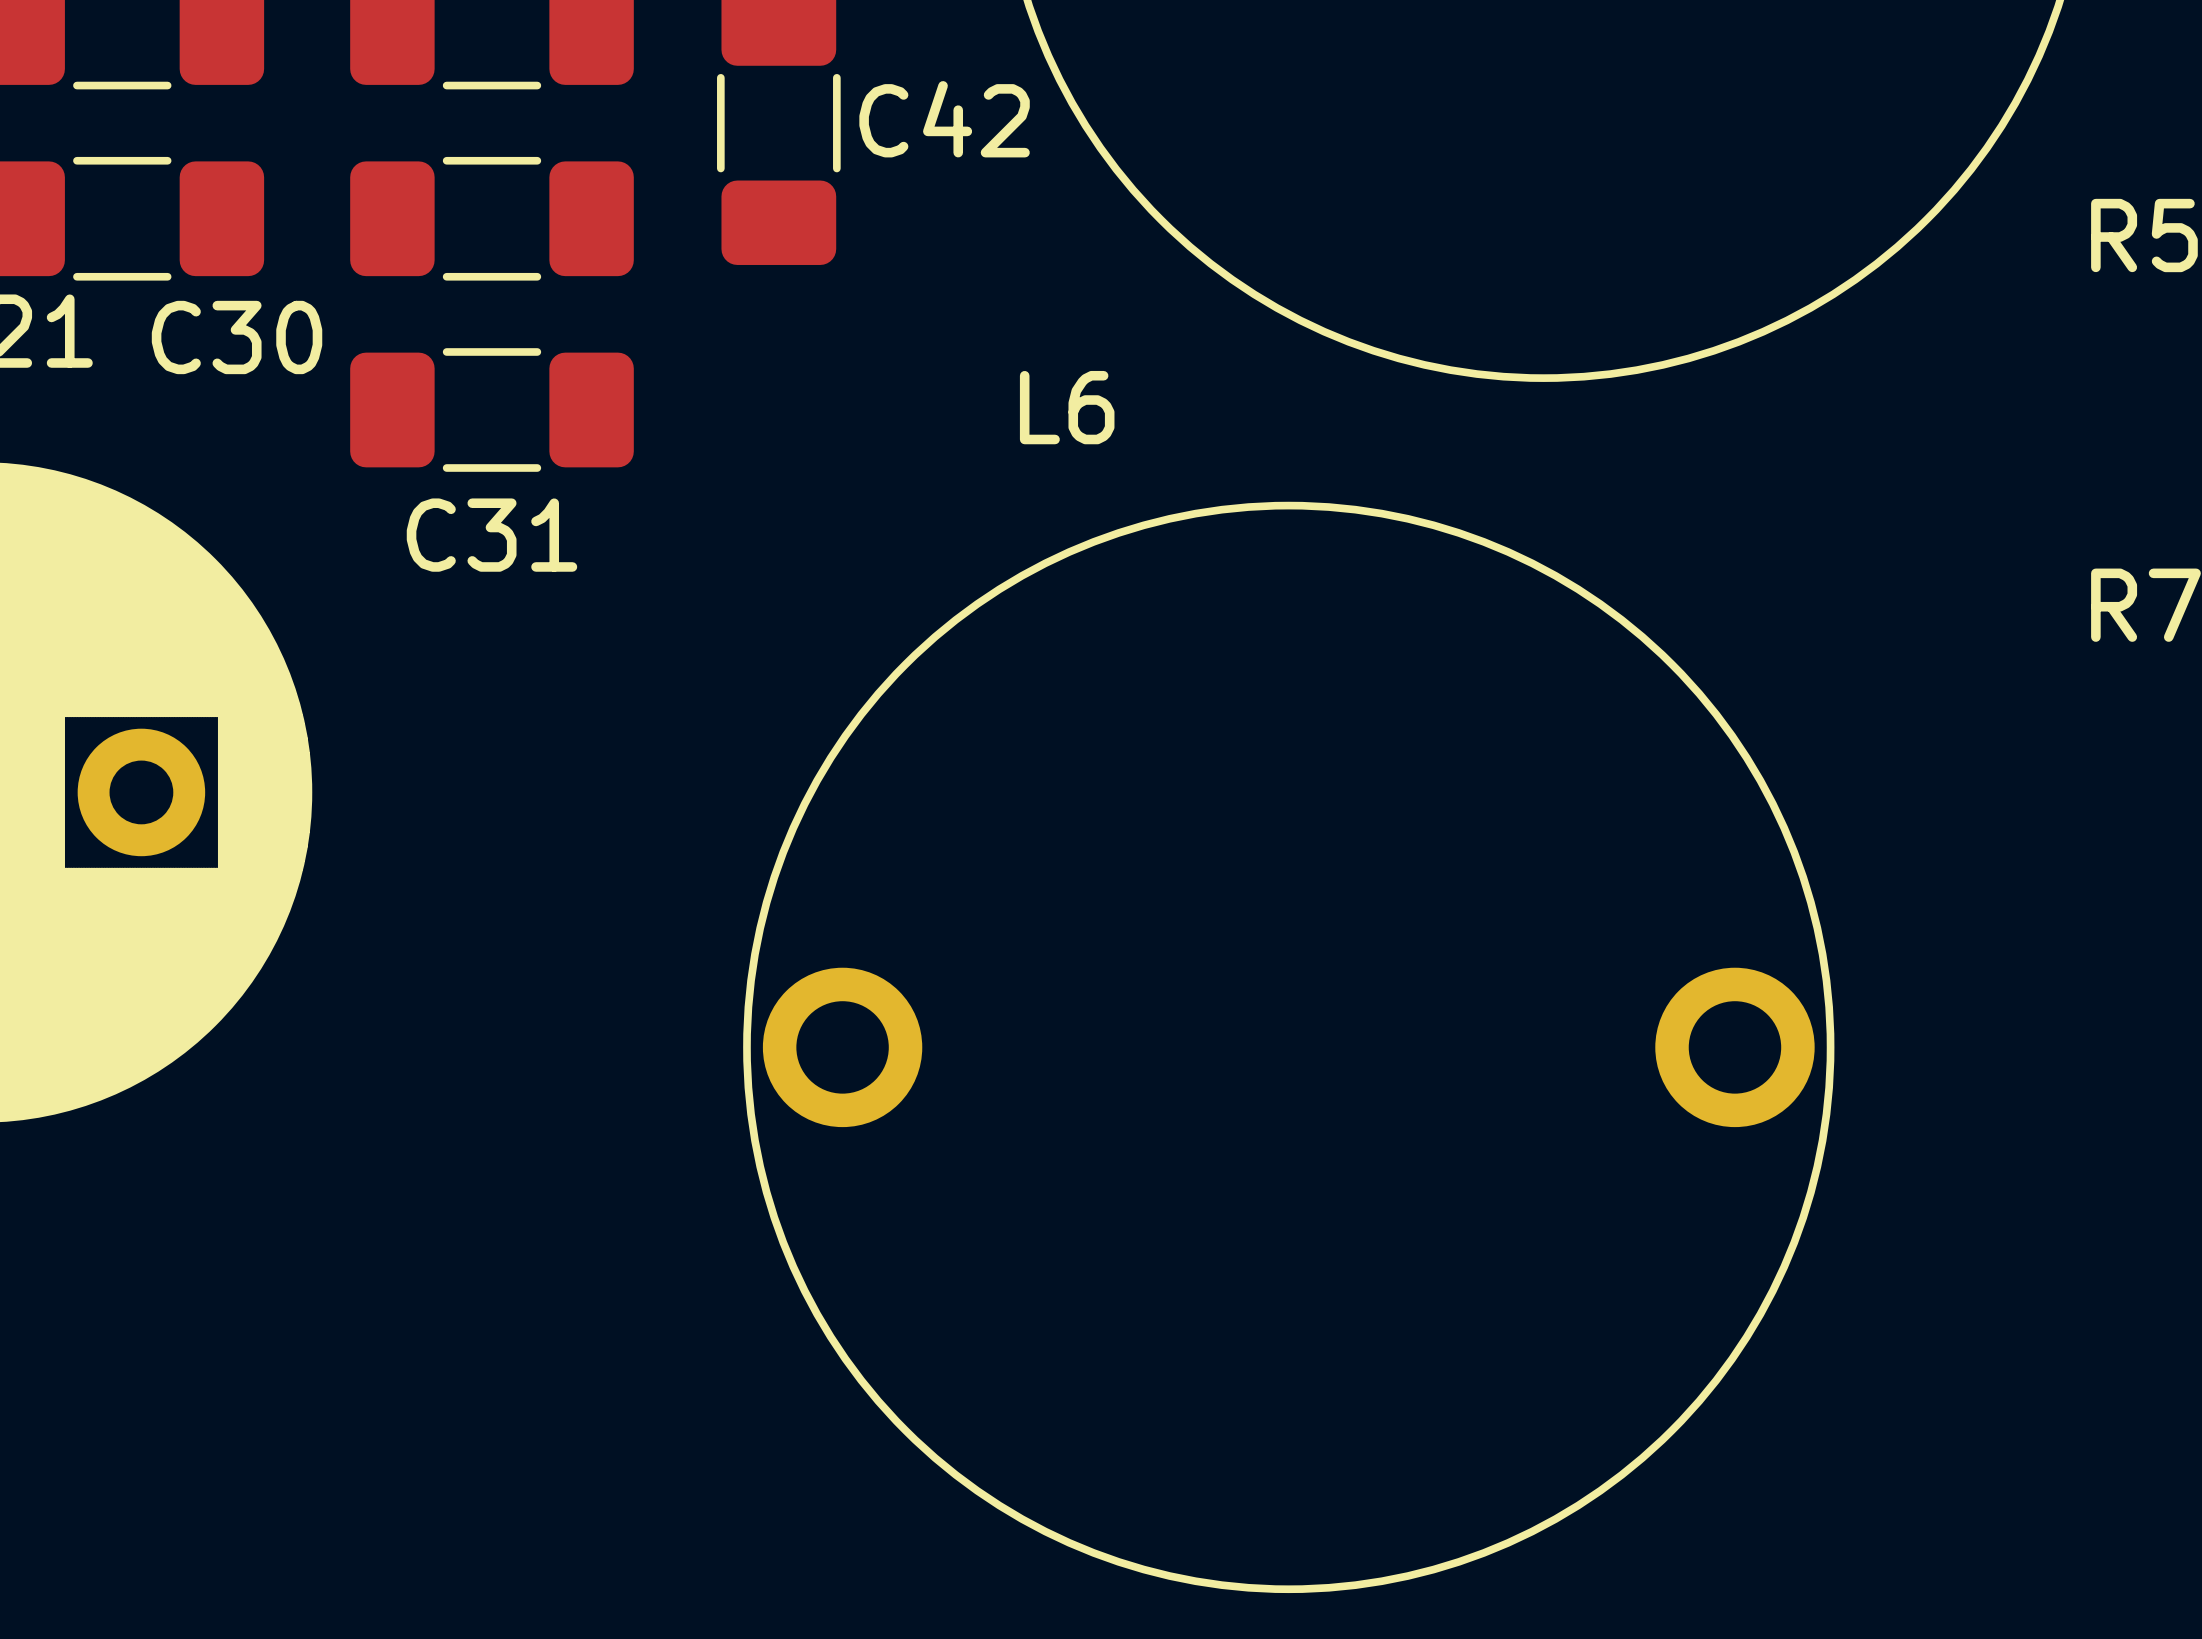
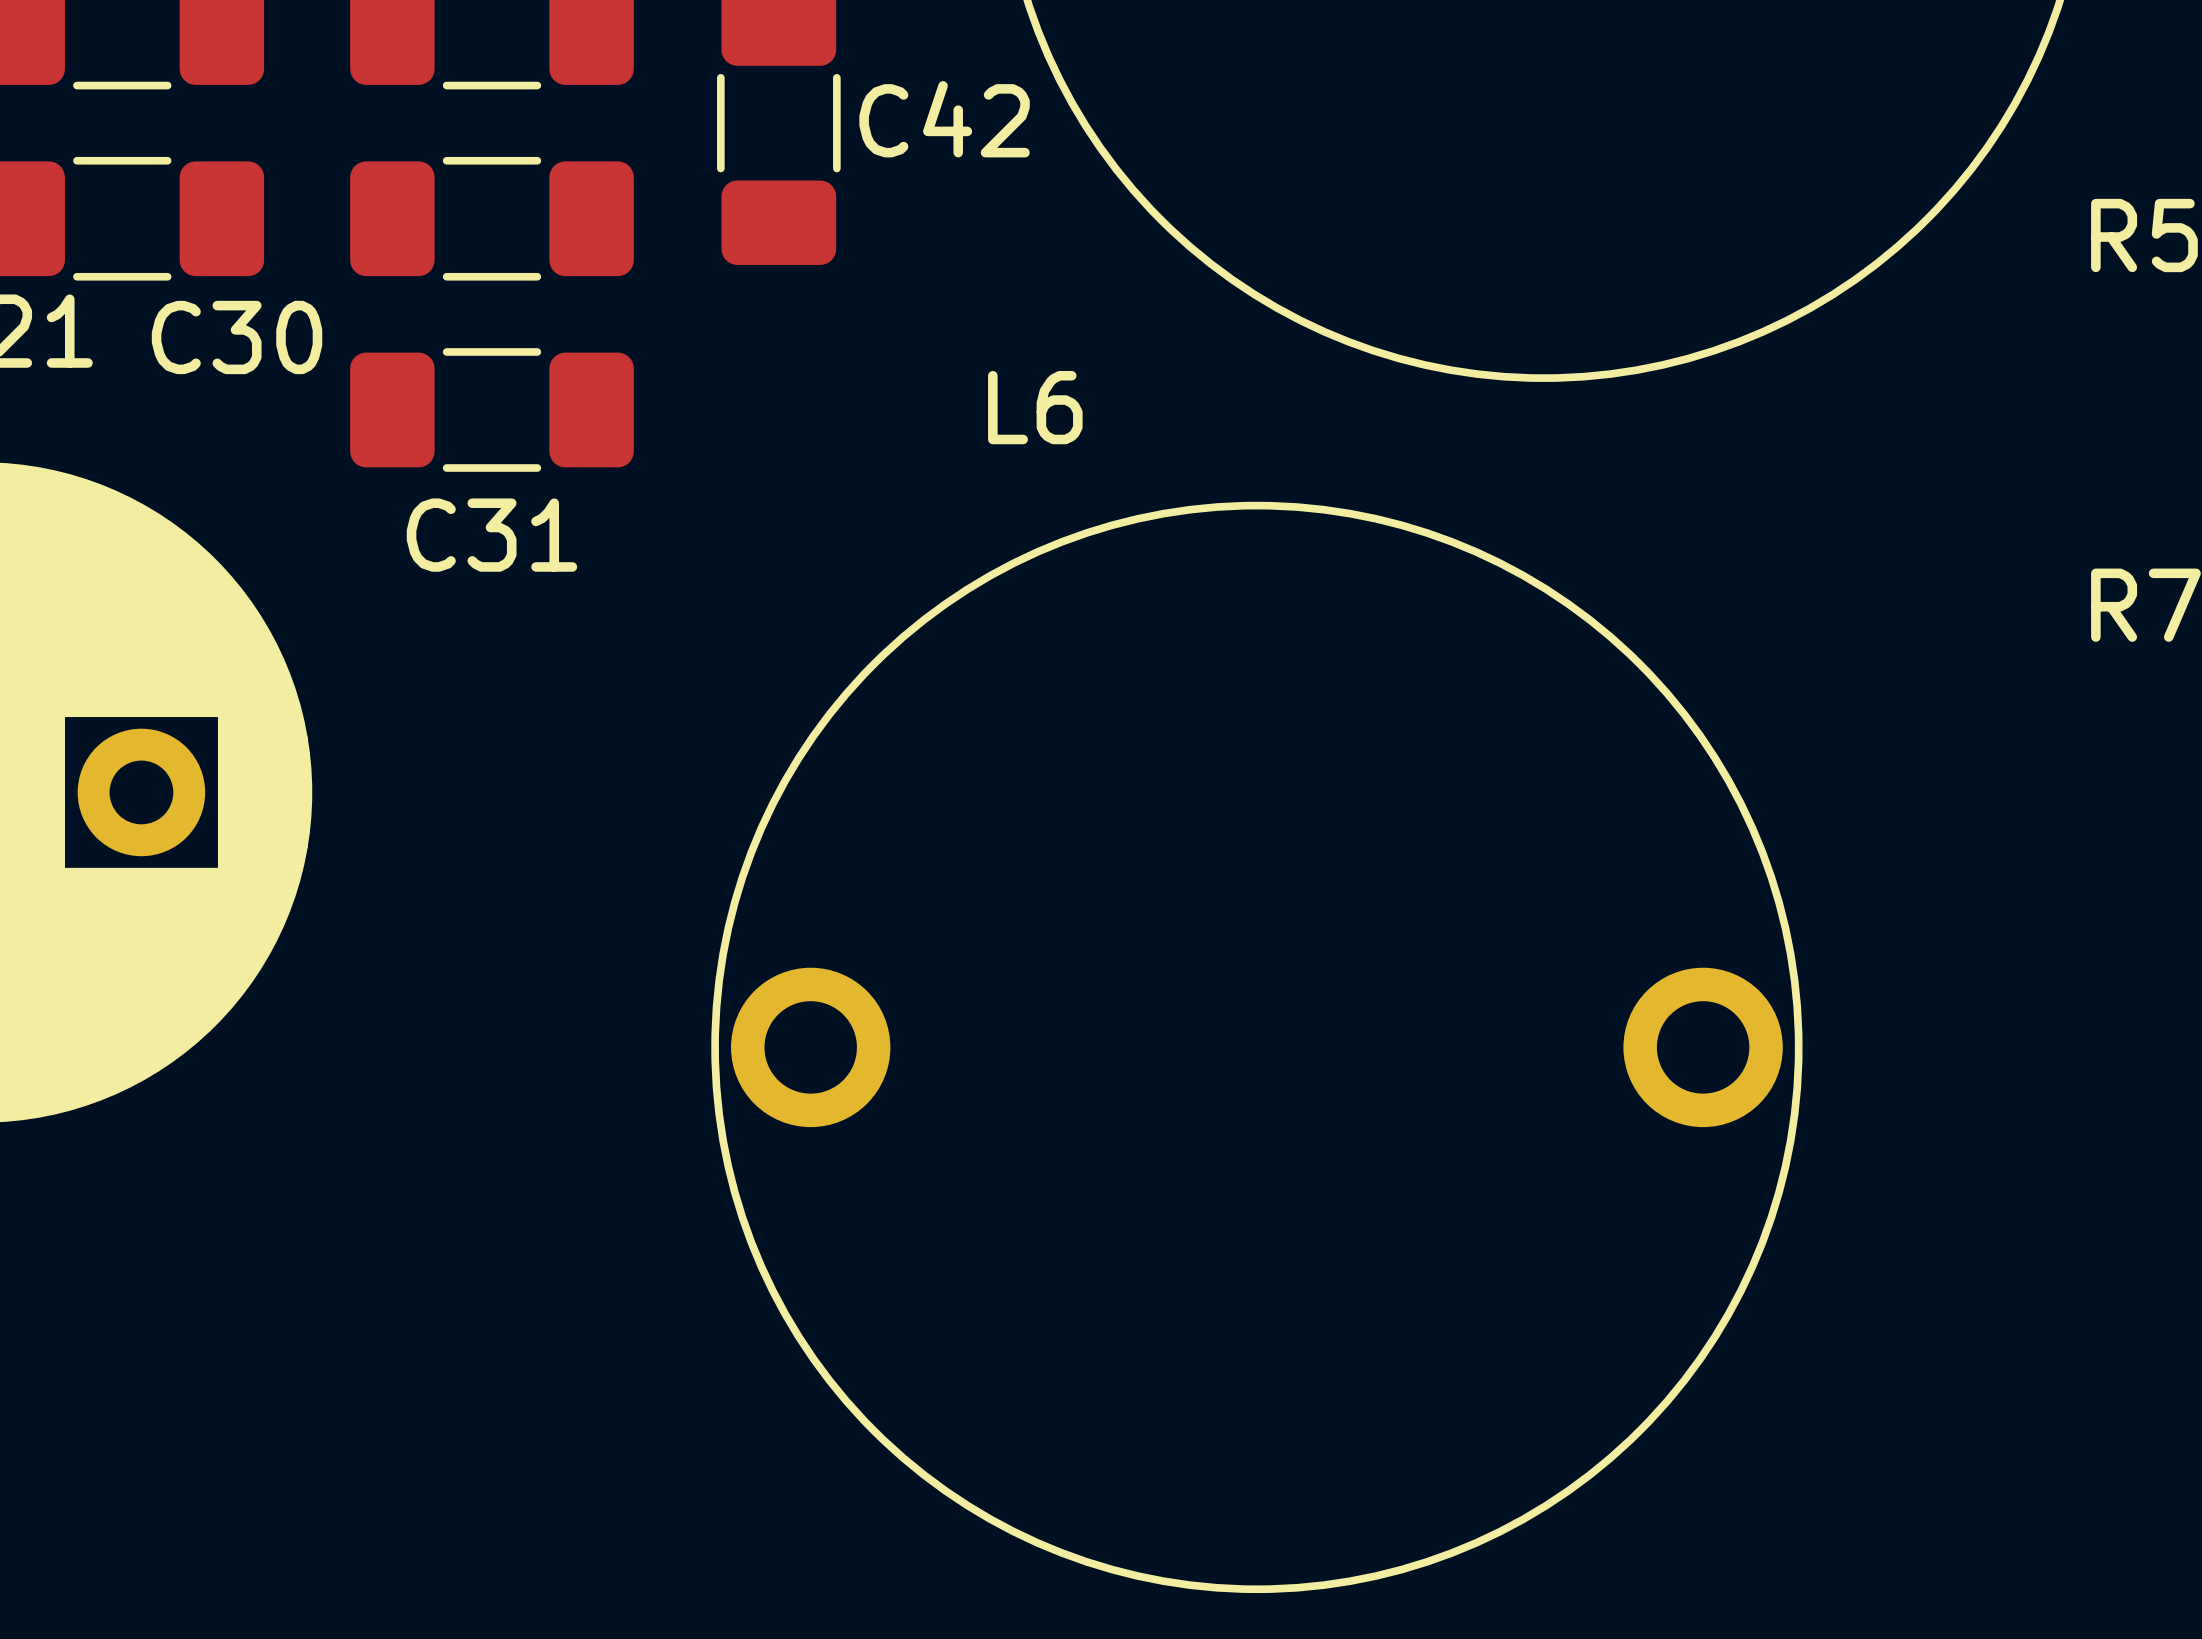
L6 position: (1288, 1047) -> (1256, 1047)

